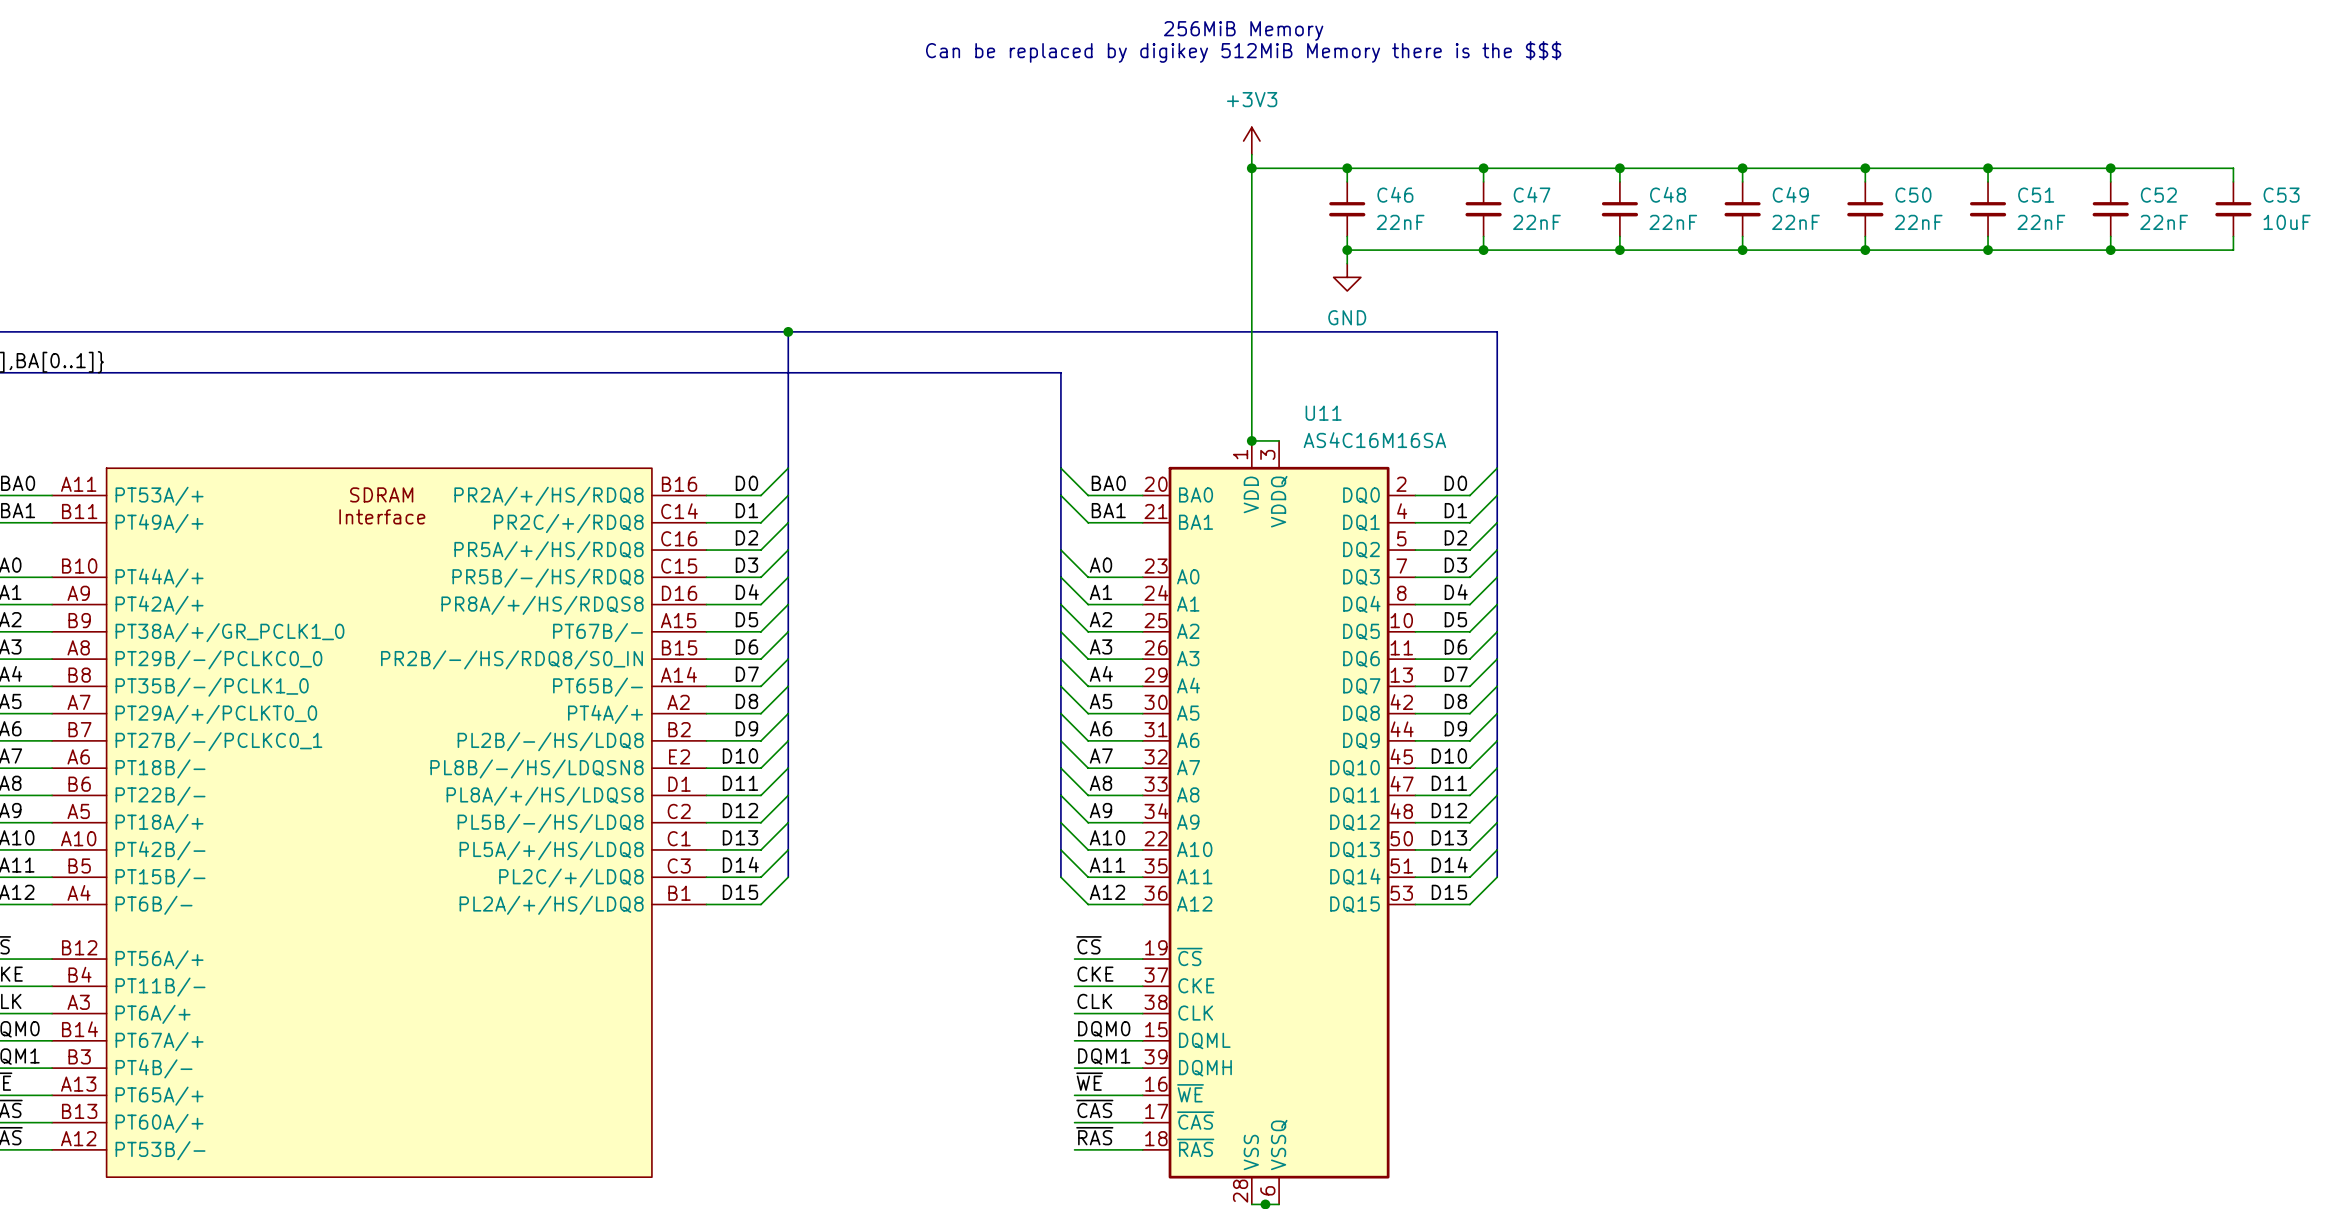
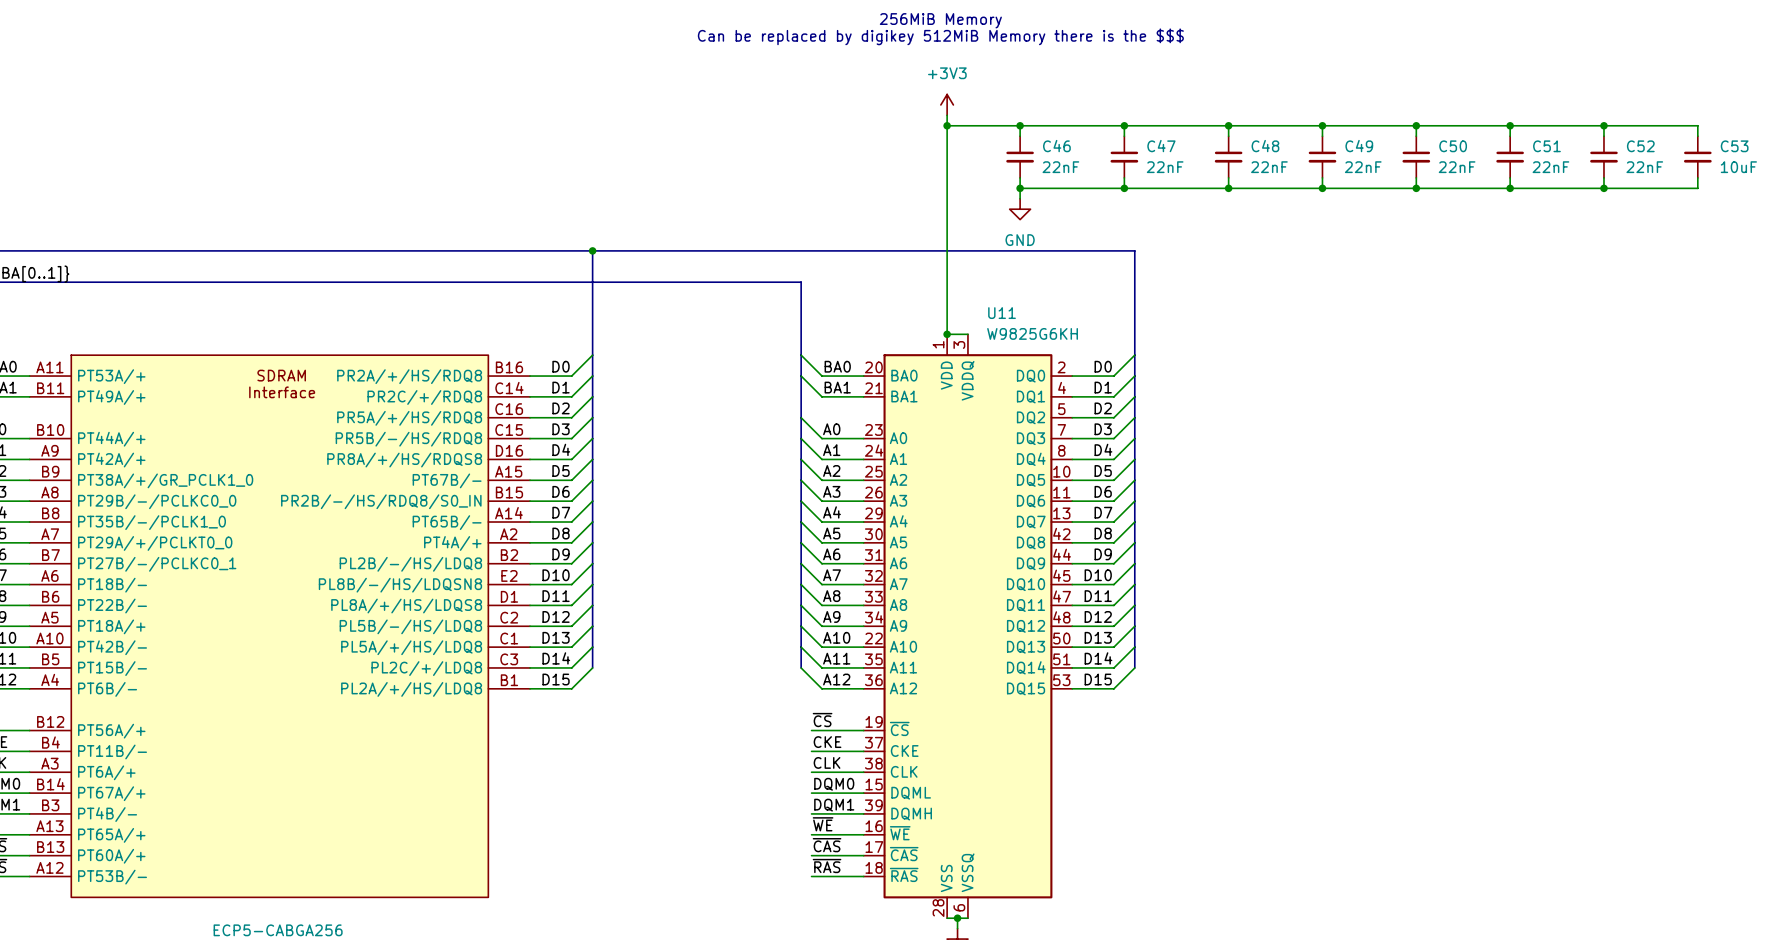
U11 value: AS4C16M16SA (1374, 440) -> W9825G6KH (1032, 333)

